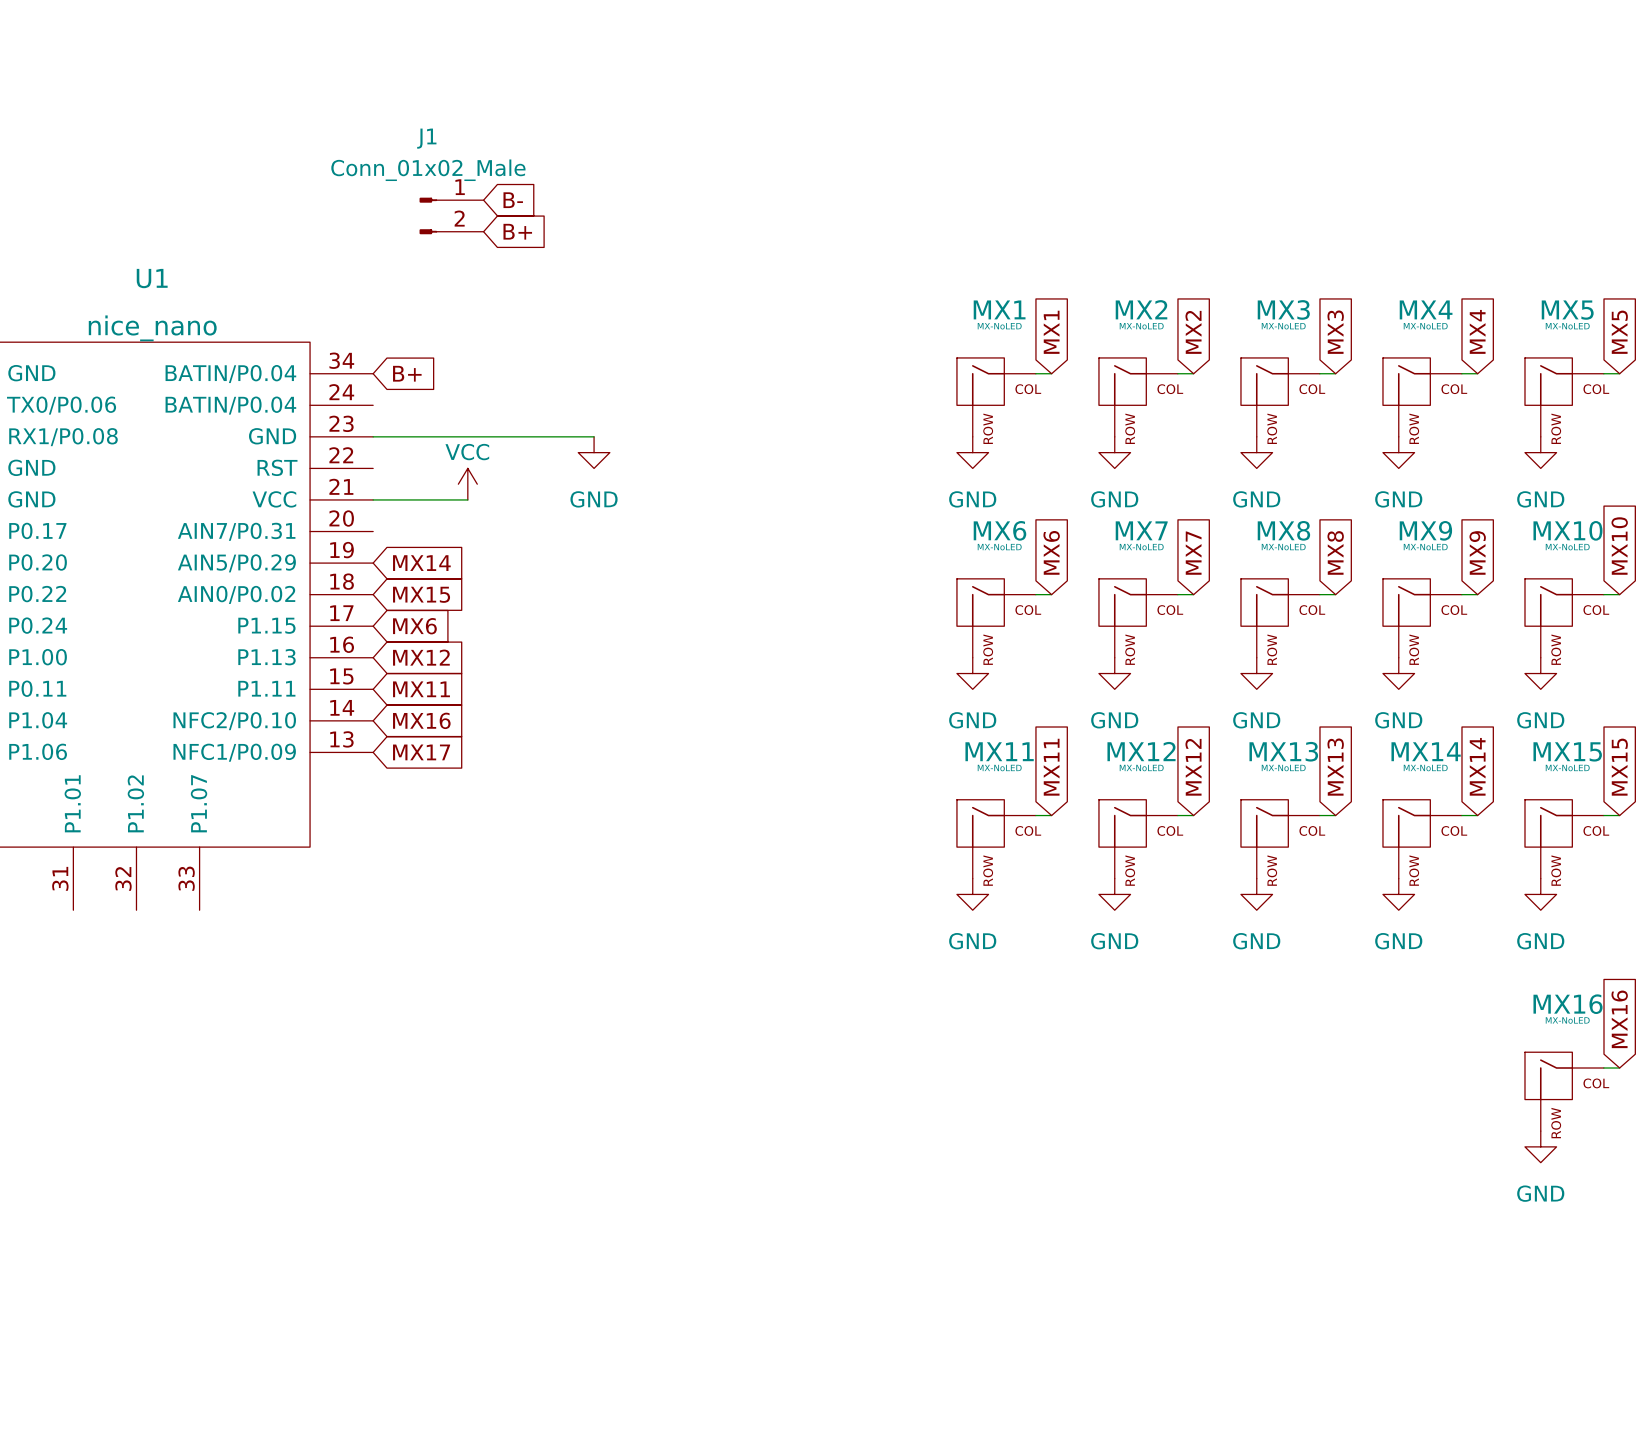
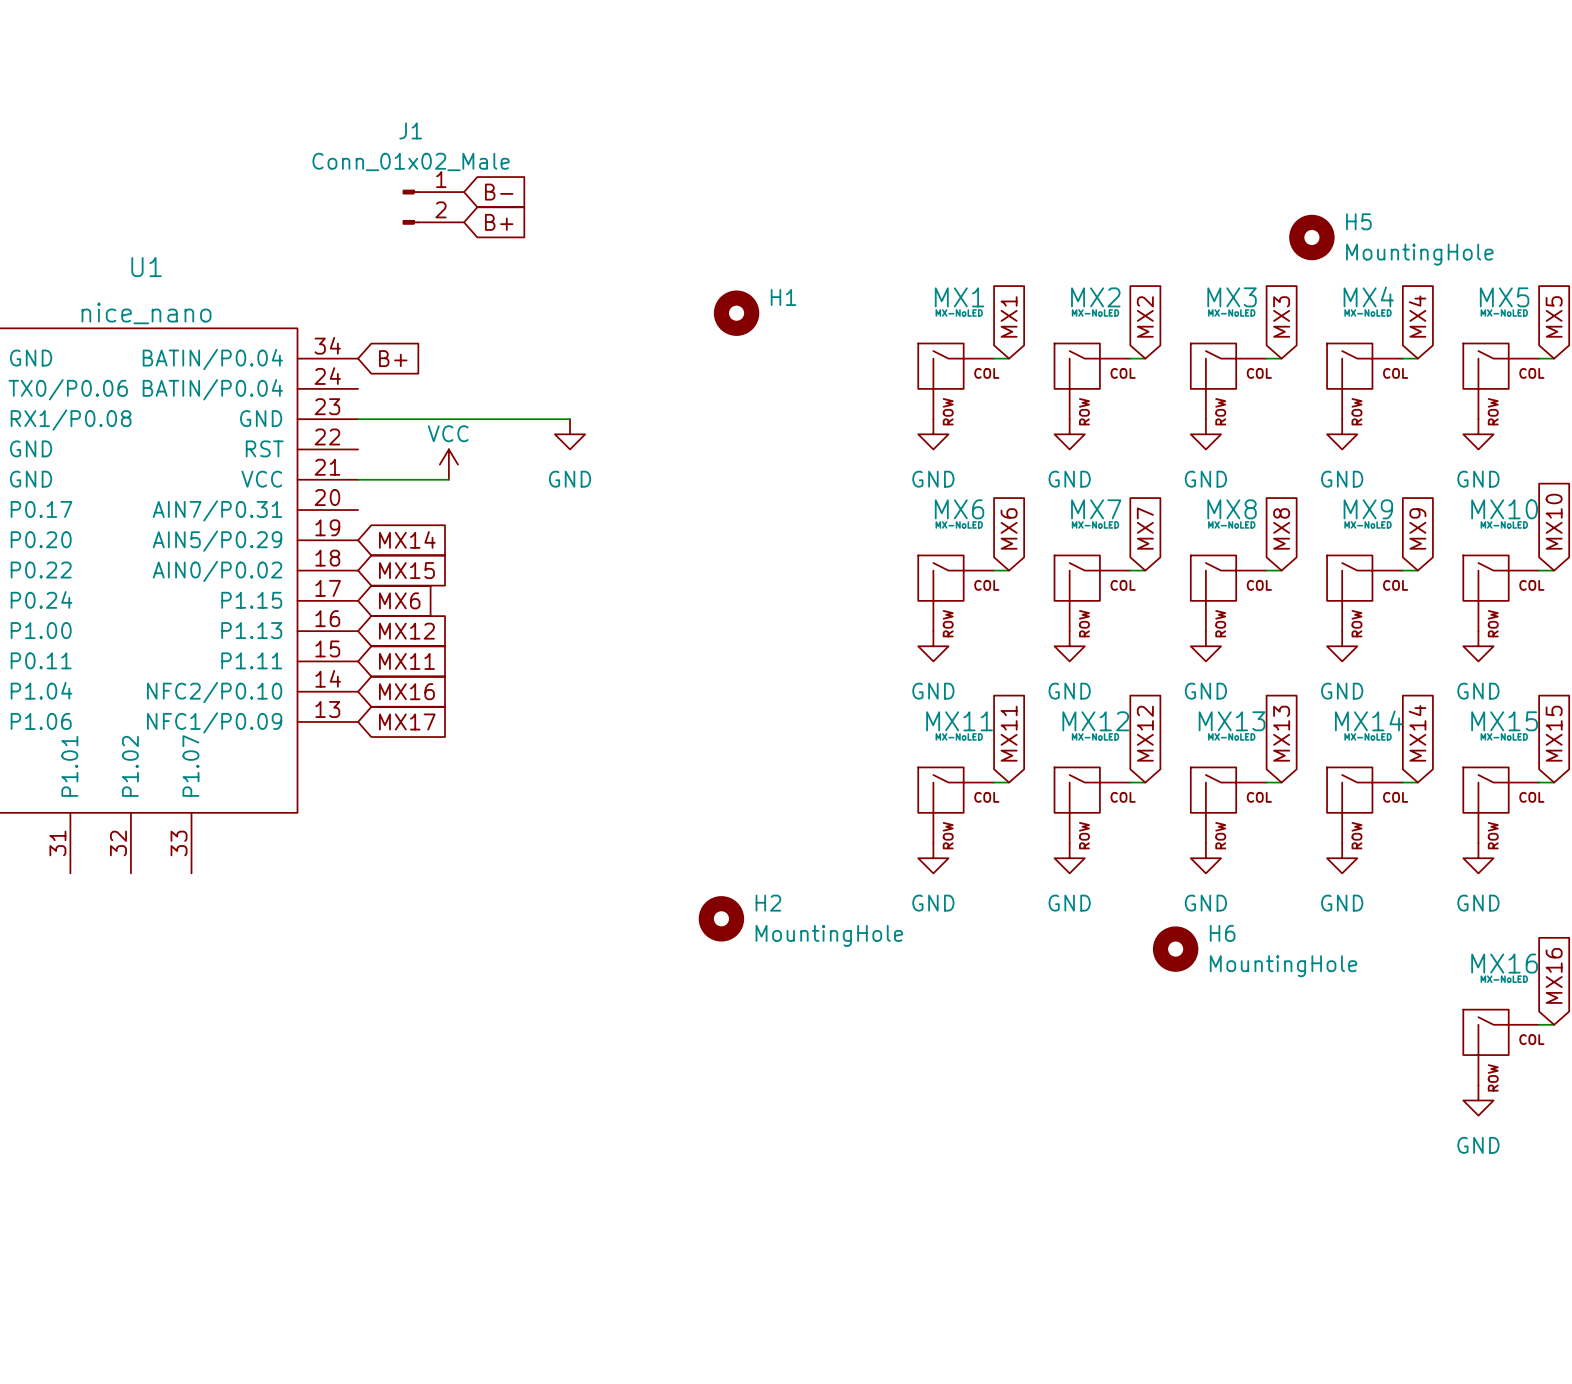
H5: none -> MountingHole (1311, 237)
H1: none -> (736, 313)
H2: none -> MountingHole (721, 918)
H6: none -> MountingHole (1175, 949)

